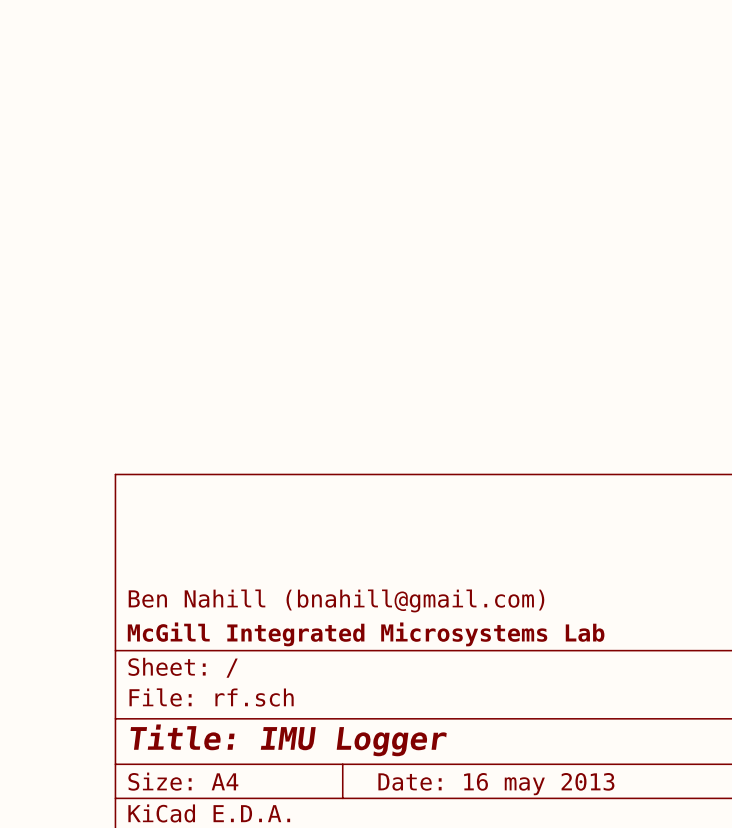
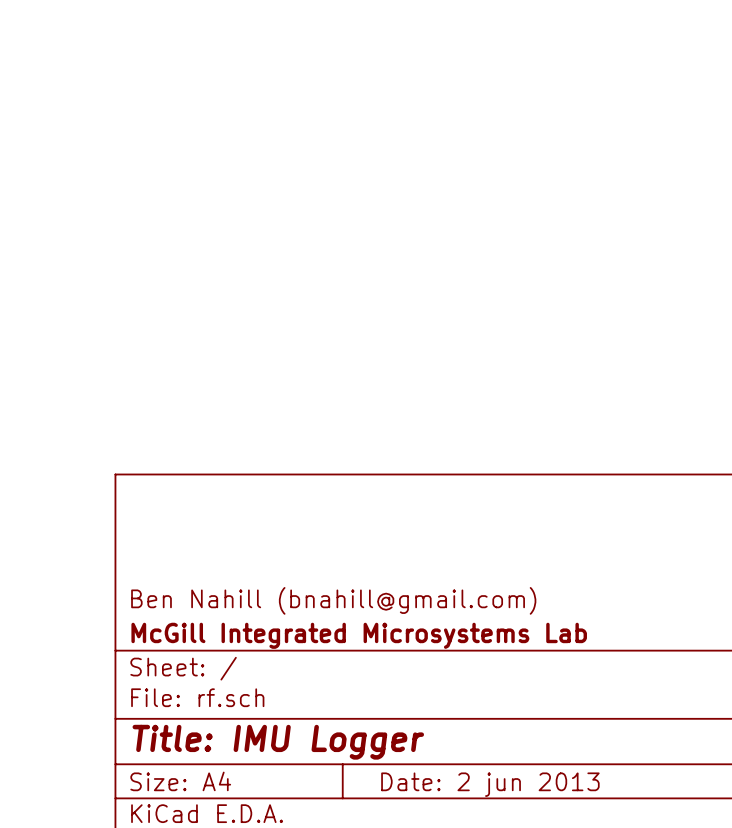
title block: Date: 16 may 2013 (496, 784) -> Date: 2 jun 2013 (490, 784)

